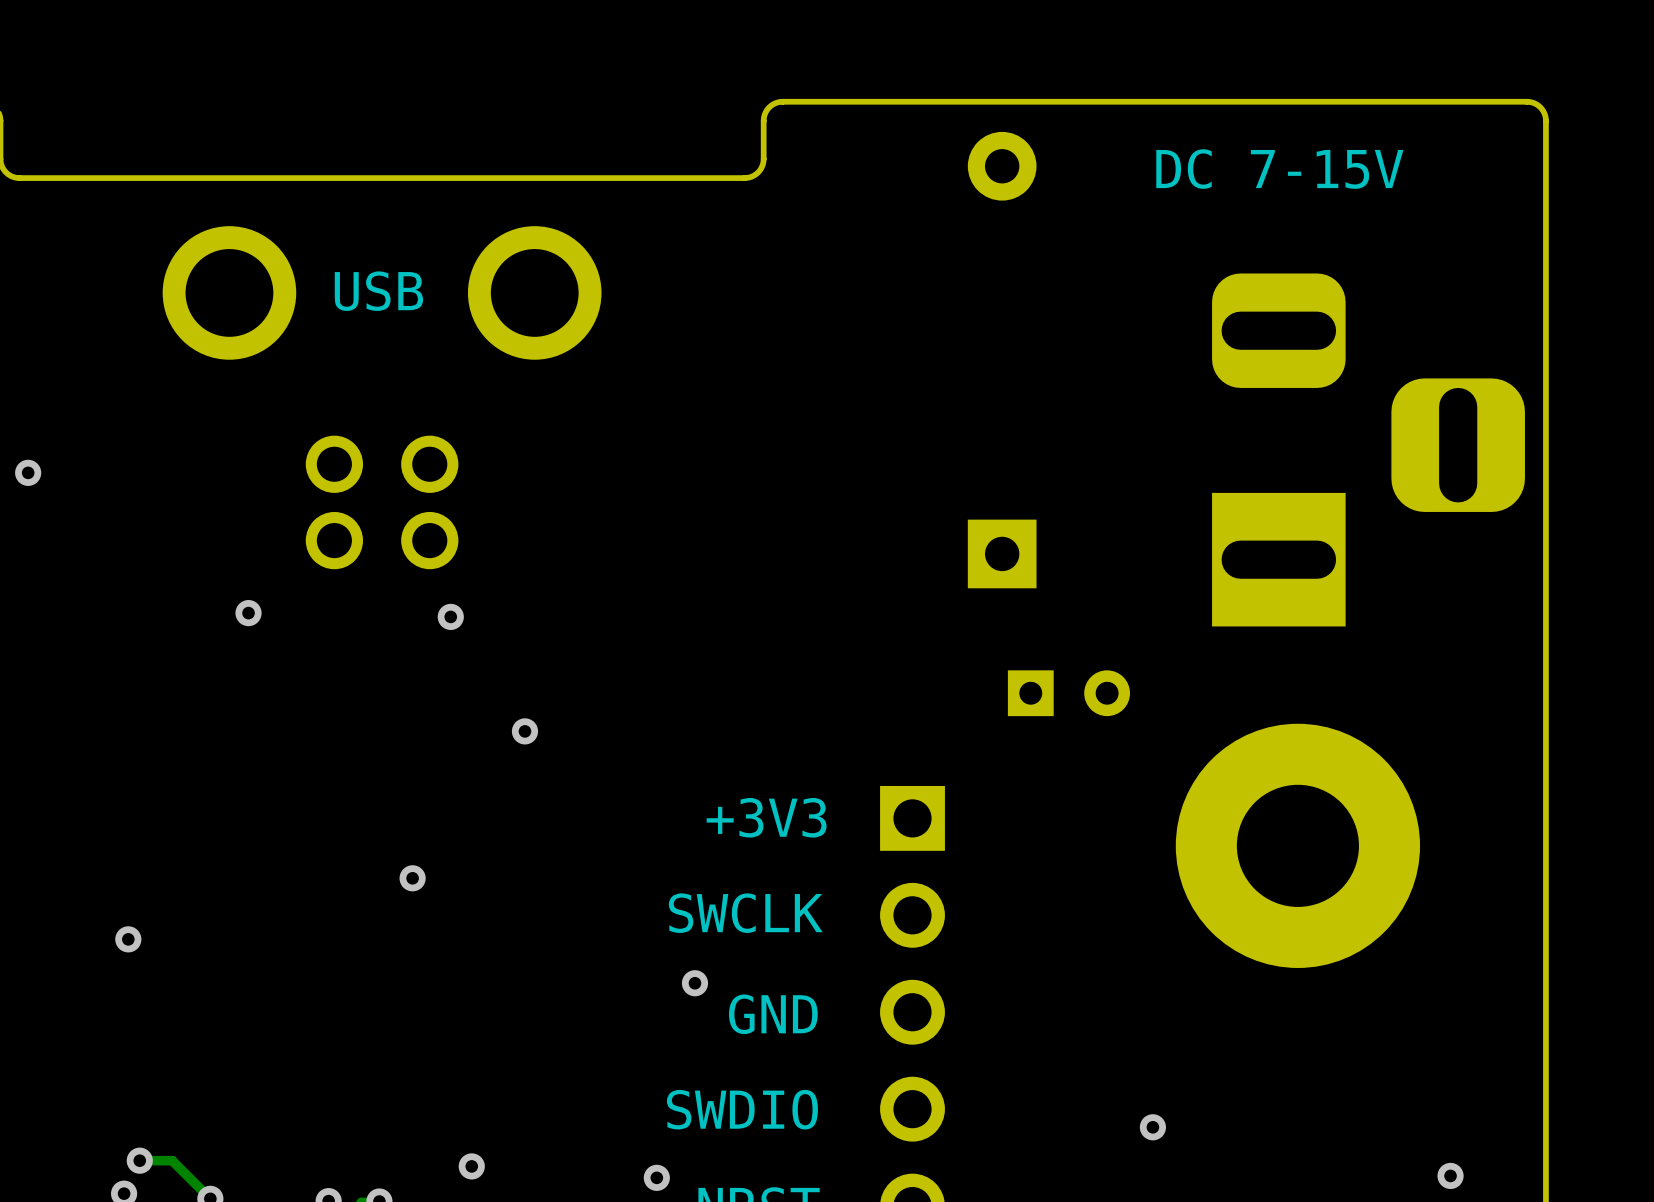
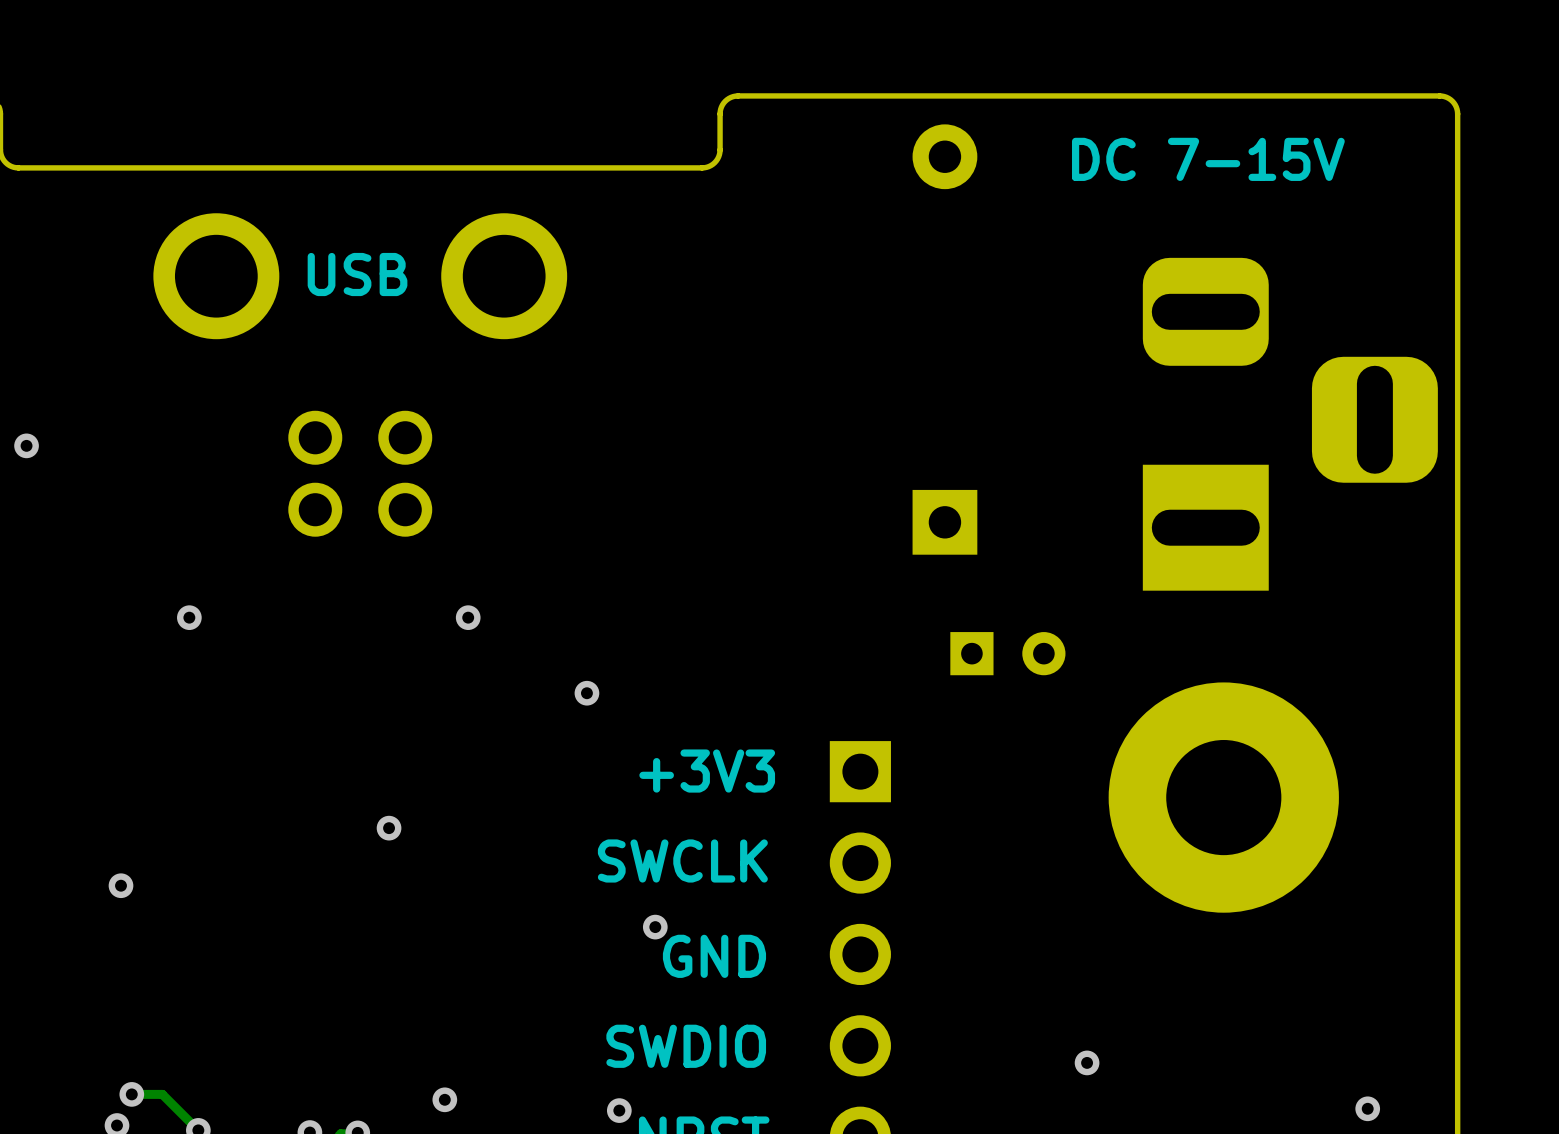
via position: (248, 613) -> (189, 617)
via: (450, 616) -> none
via: none -> (468, 617)
via: (524, 731) -> none
via: none -> (586, 693)

